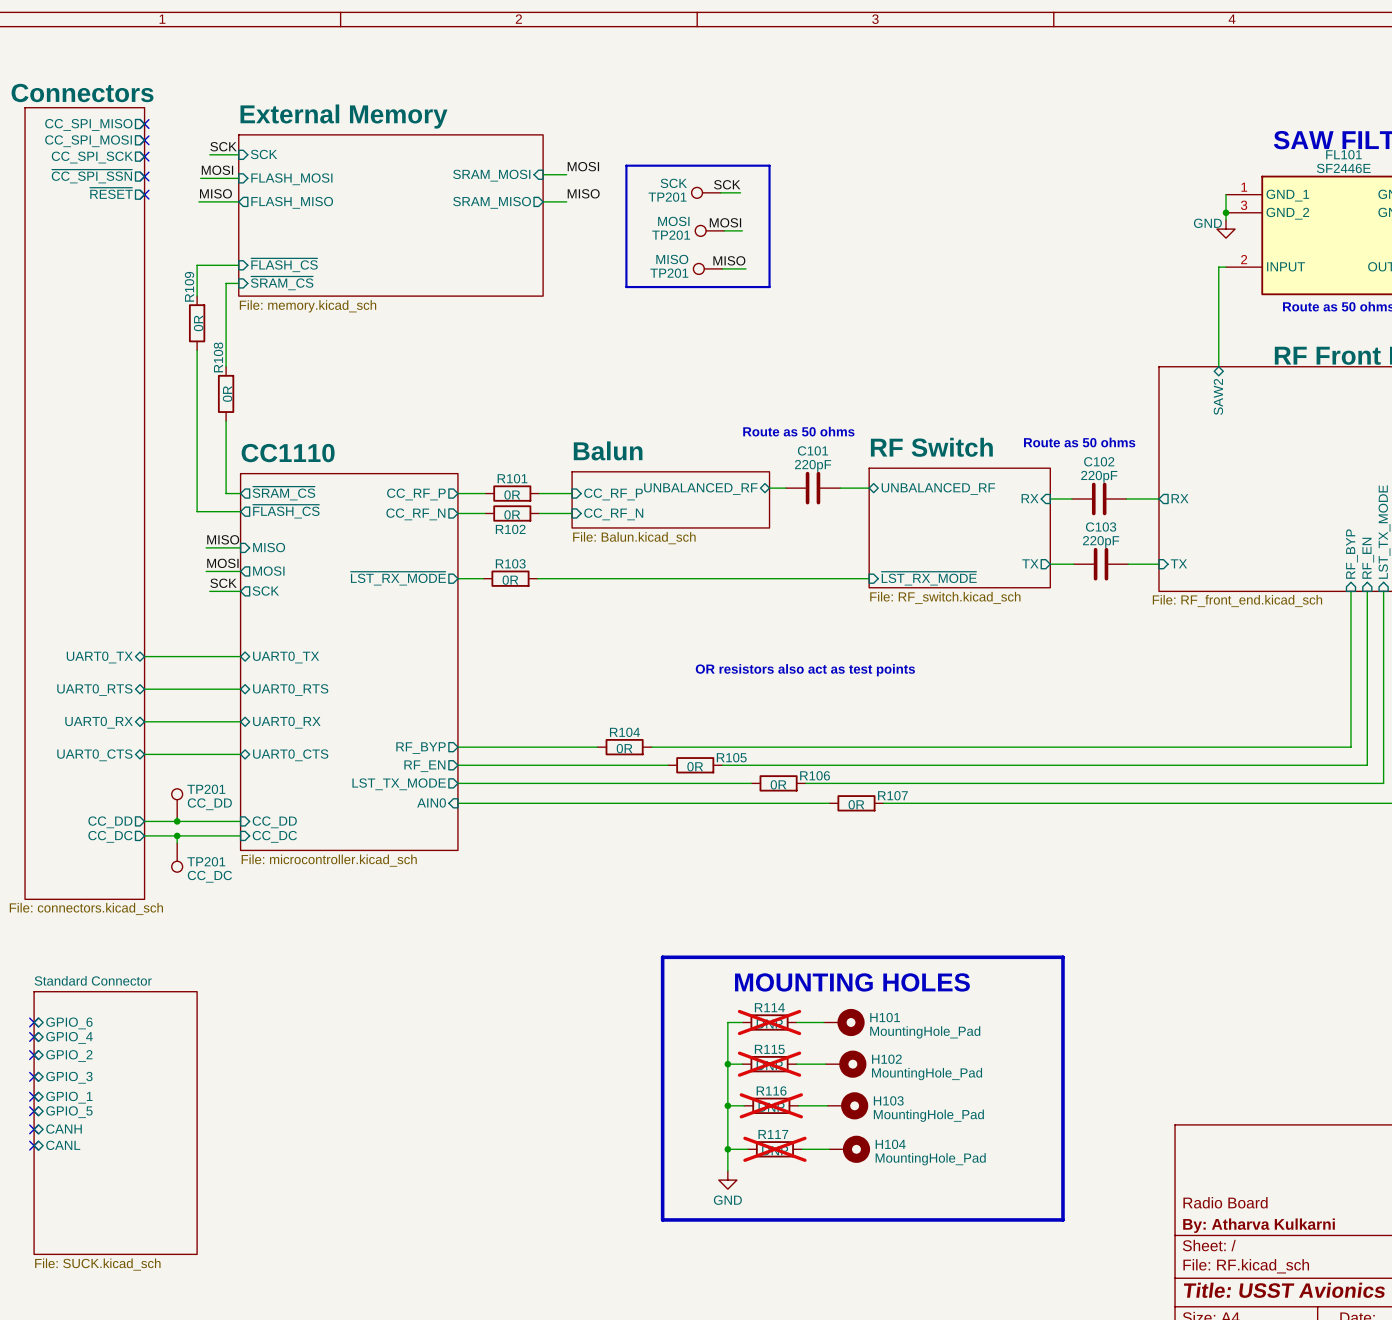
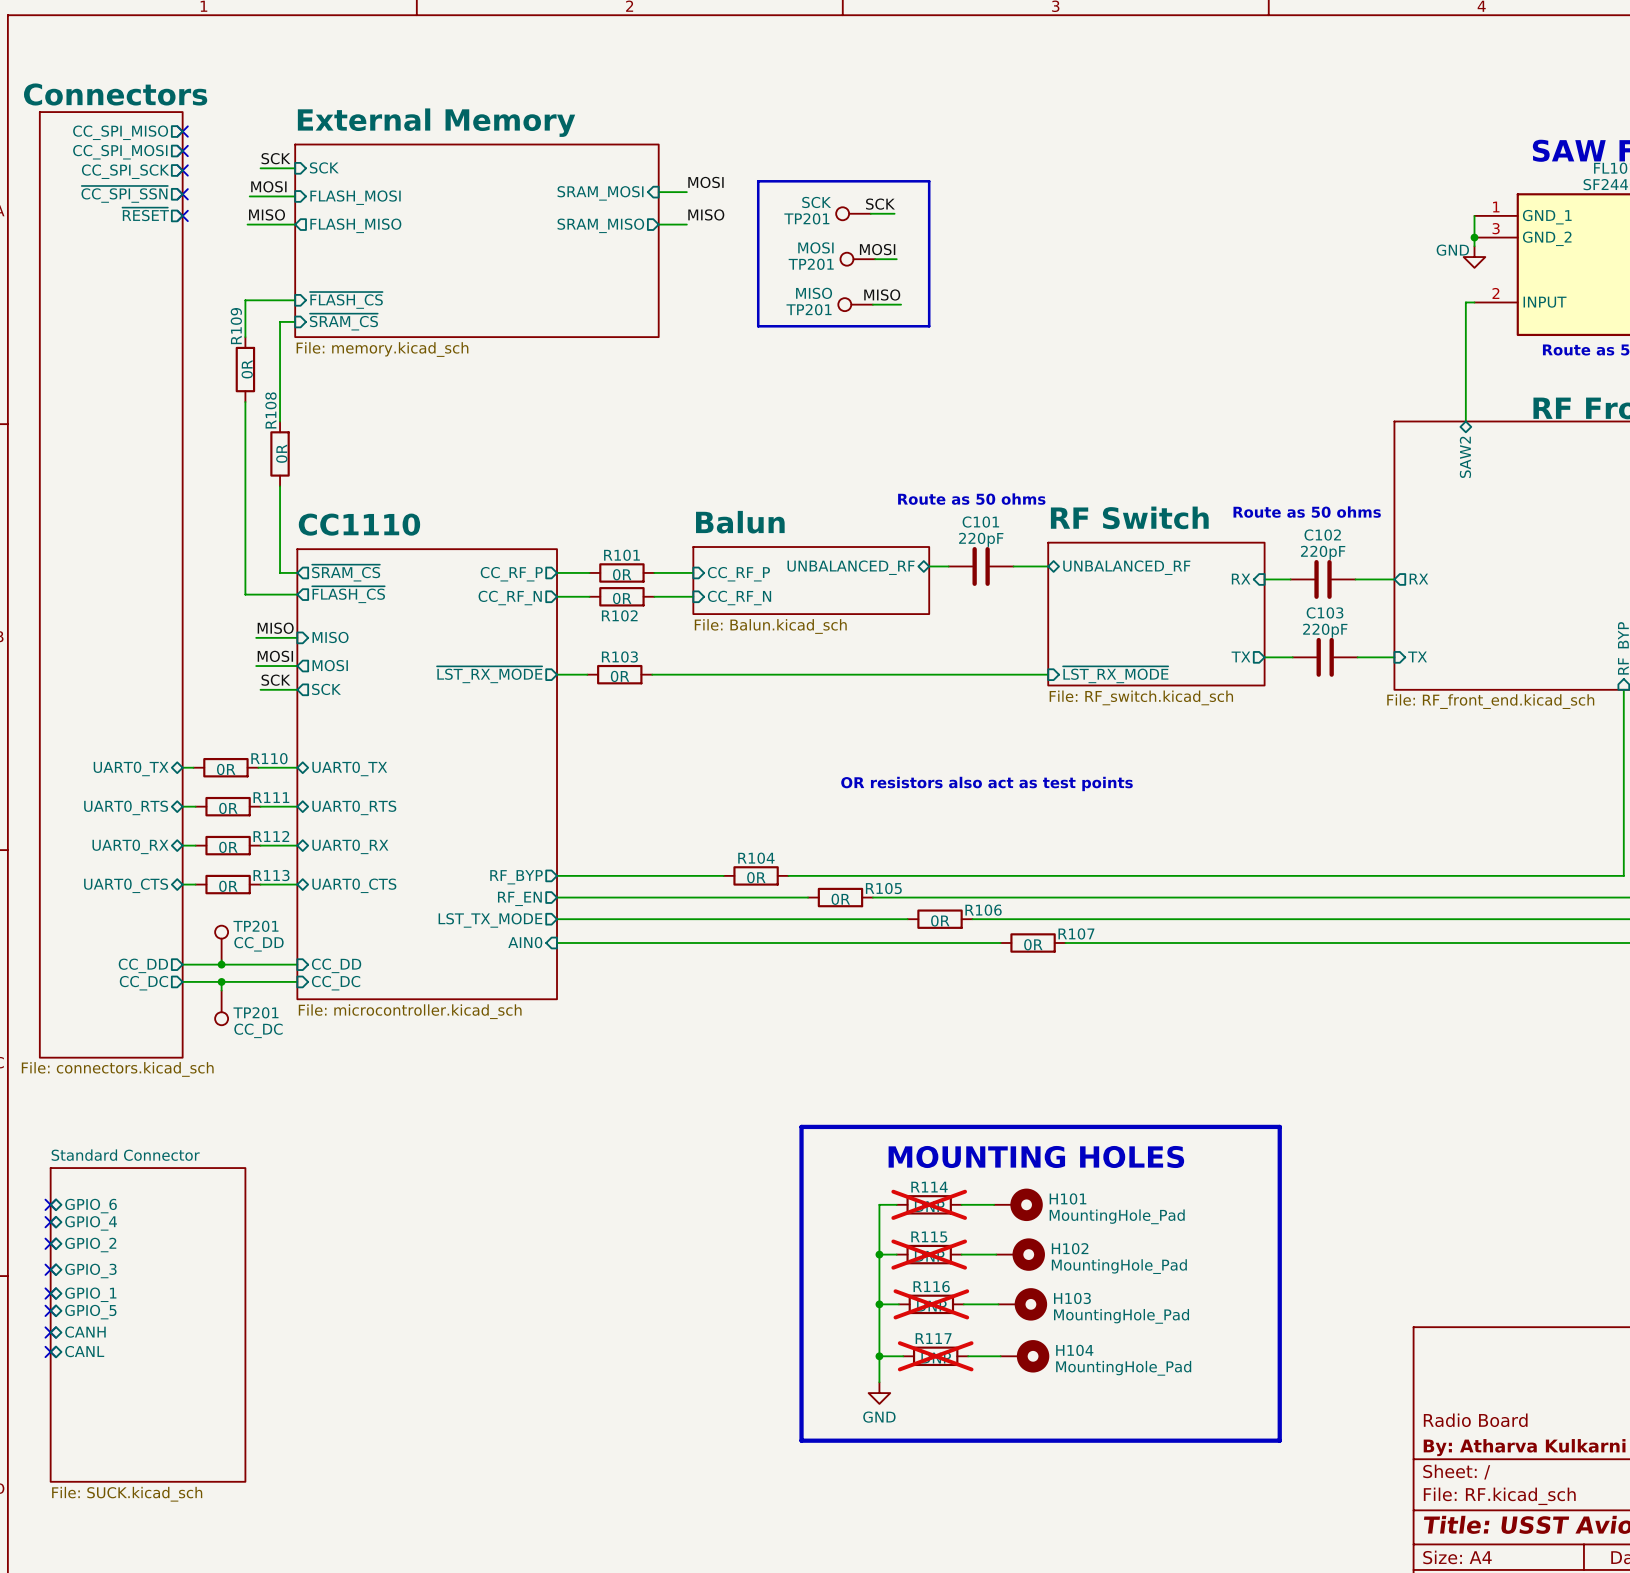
wire: (153, 656) (207, 656) -> none
R110: none -> 0R (225, 767)
wire: (155, 689) (209, 689) -> none
R111: none -> 0R (228, 806)
wire: (155, 721) (209, 721) -> none
R112: none -> 0R (228, 845)
wire: (155, 754) (209, 754) -> none
R113: none -> 0R (228, 884)

